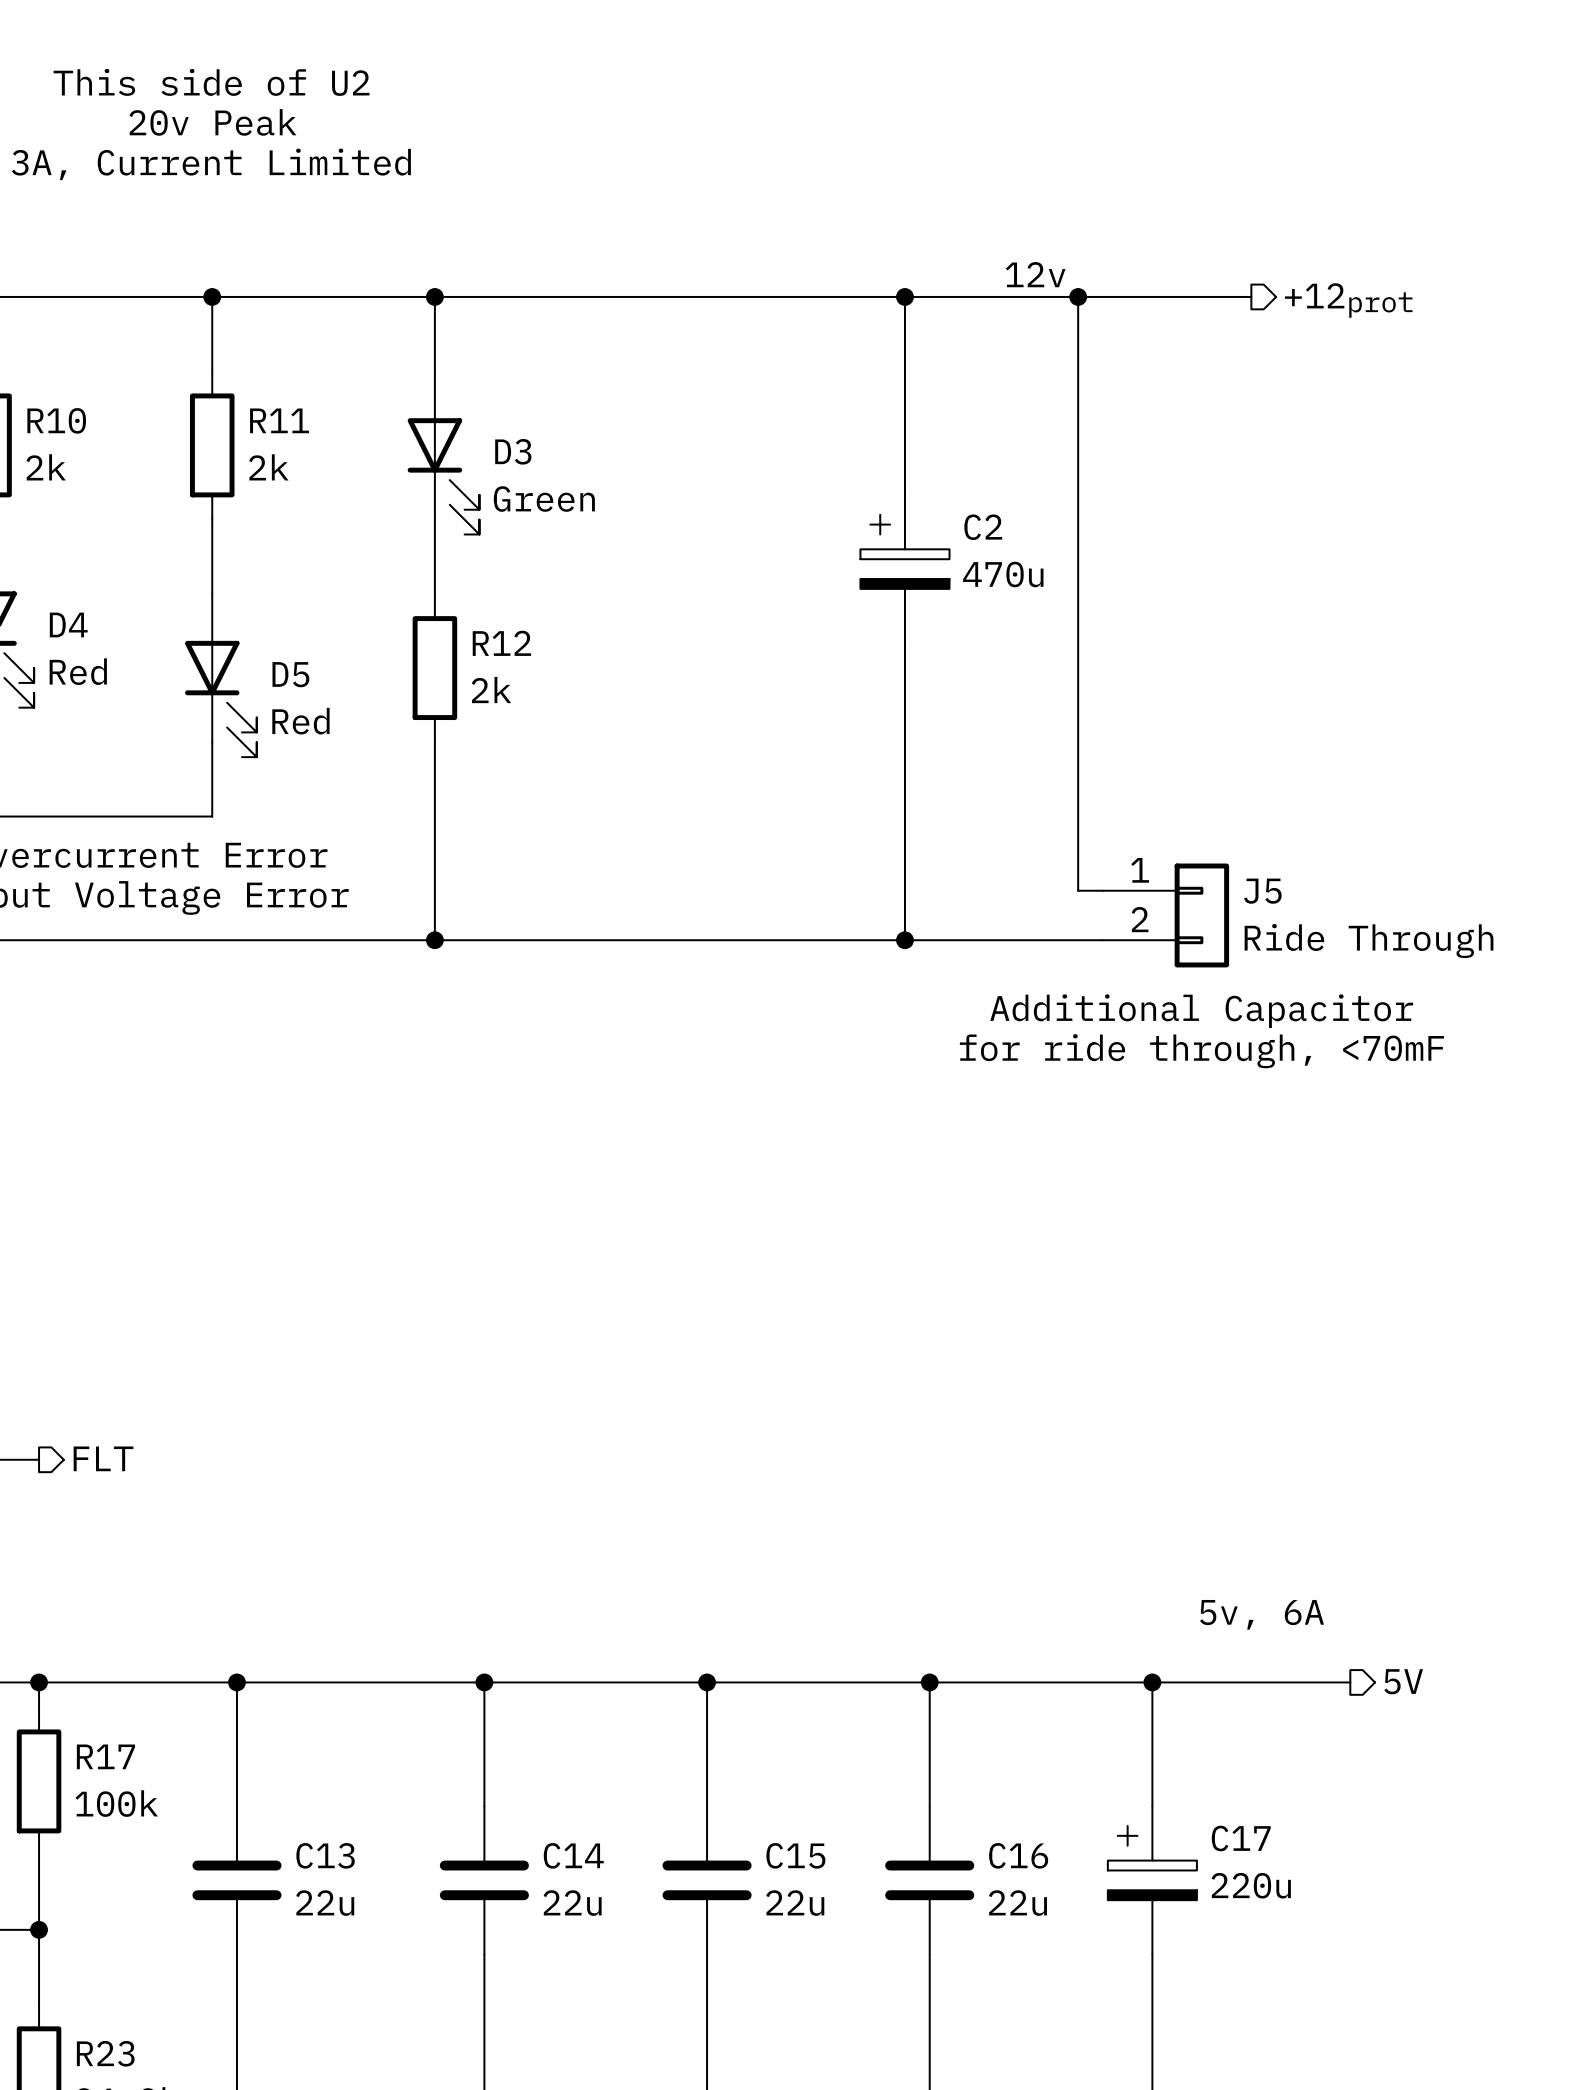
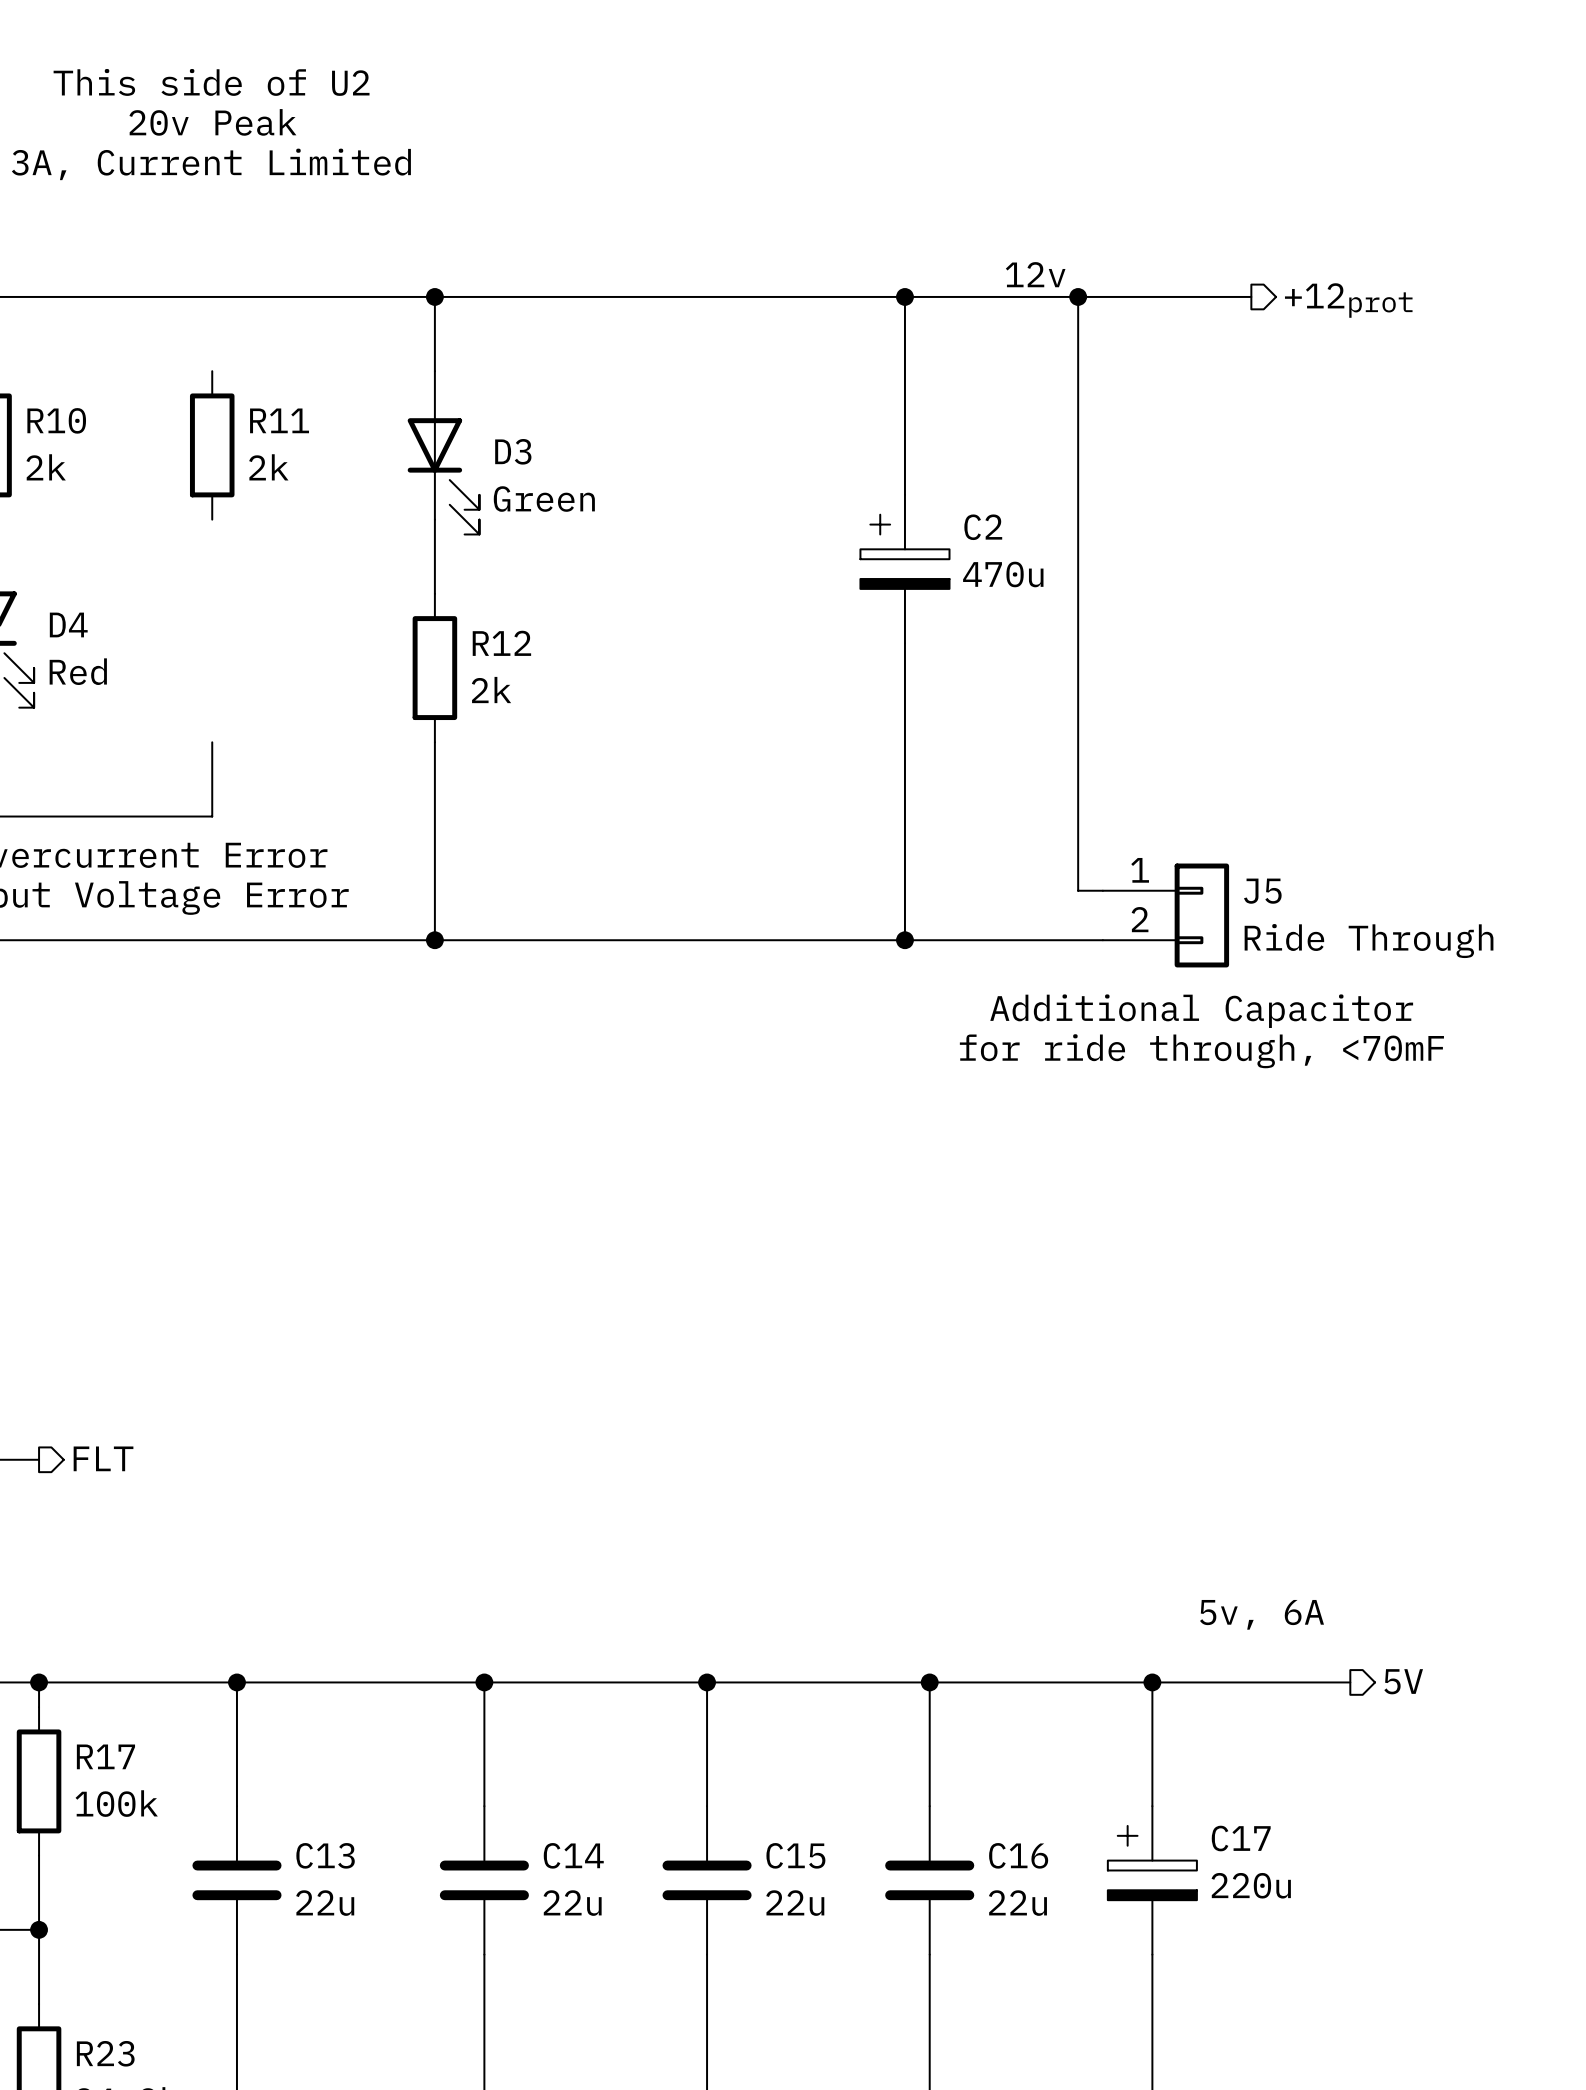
wire: (212, 296) (212, 371) -> none
junction: (212, 296) -> none
wire: (212, 519) (212, 593) -> none
D5: Red (220, 675) -> none

